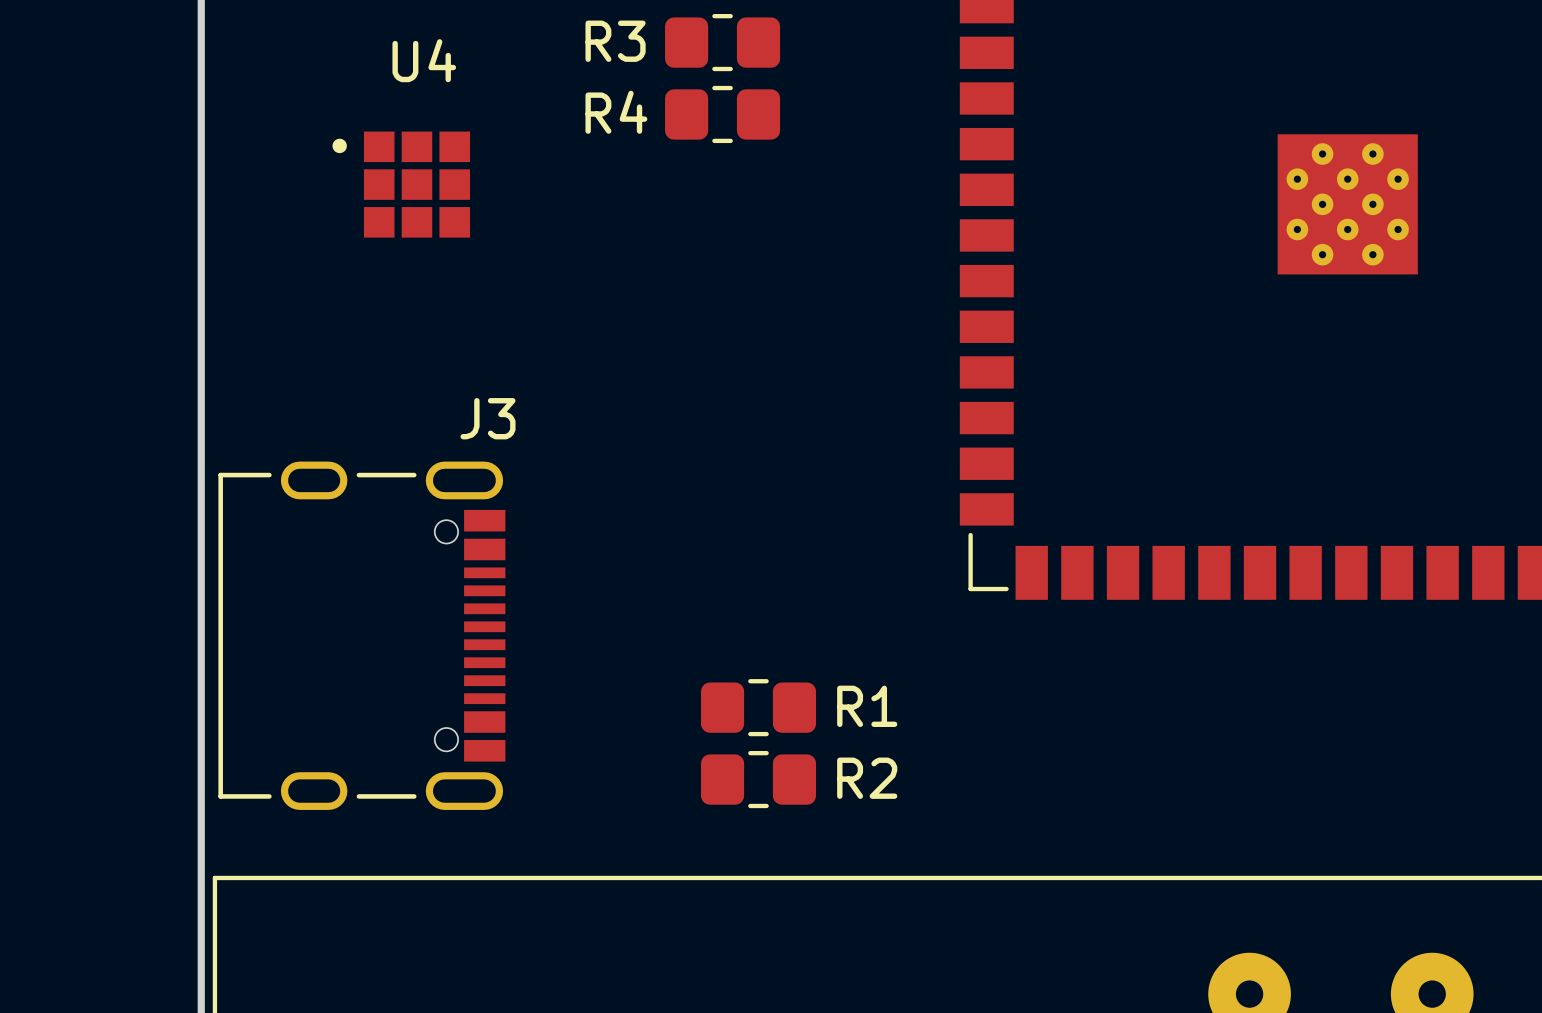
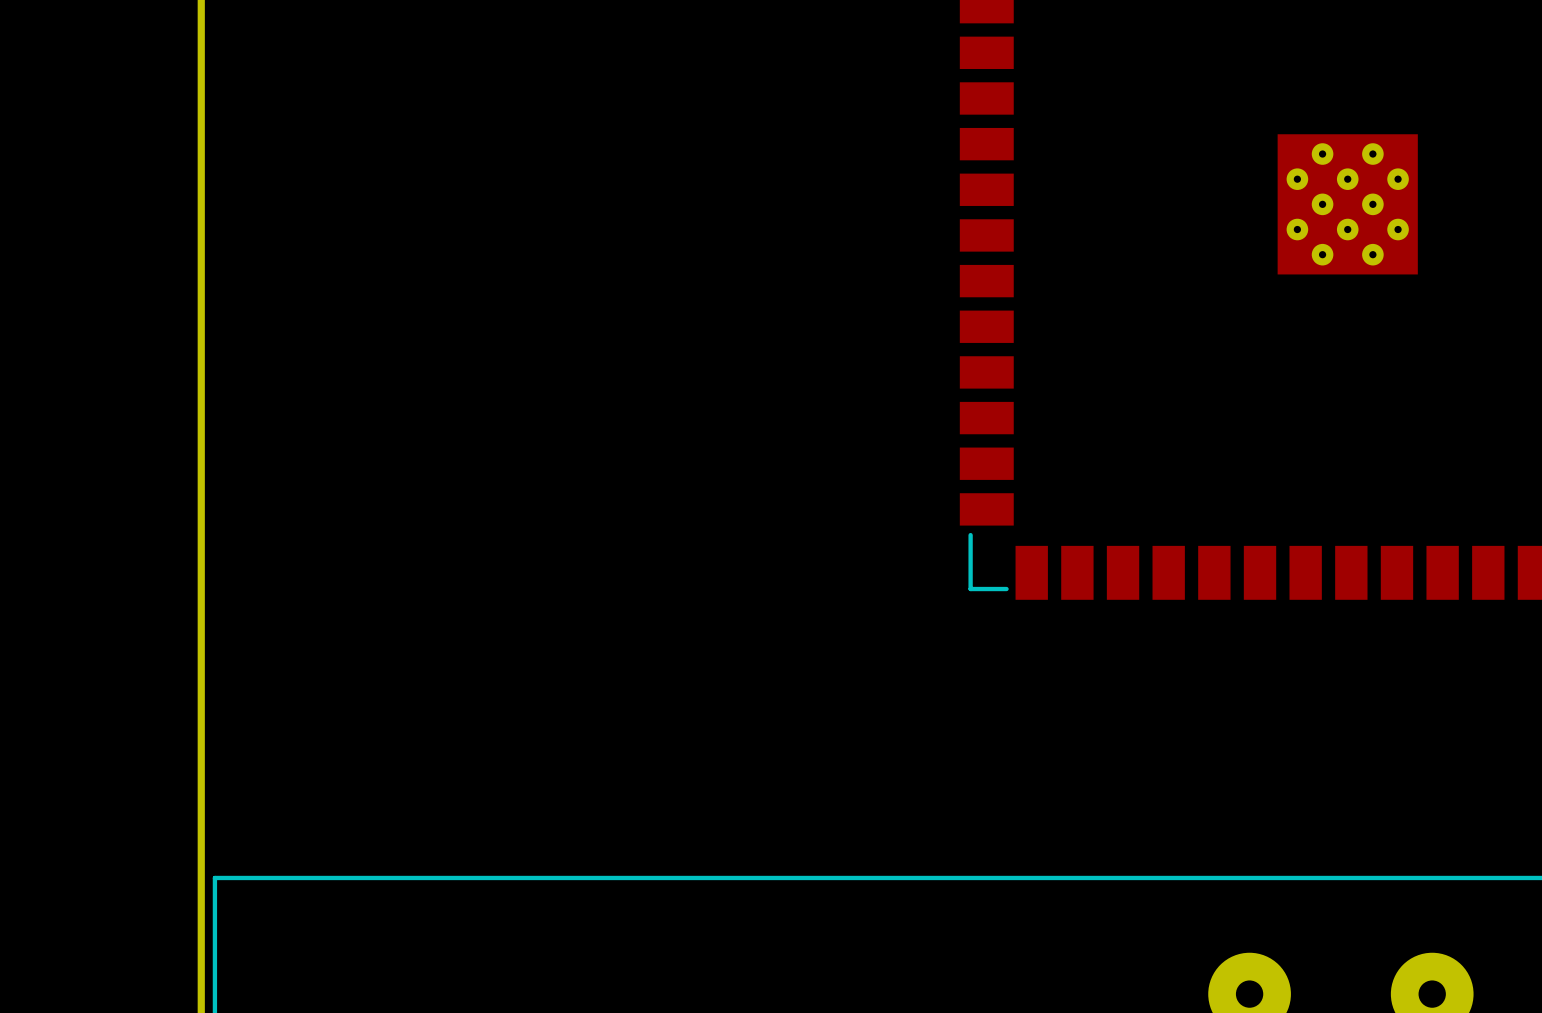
R3: (722, 42) -> none
R4: (722, 114) -> none
U4: (401, 184) -> none
J3: (361, 635) -> none
R1: (758, 707) -> none
R2: (758, 779) -> none

